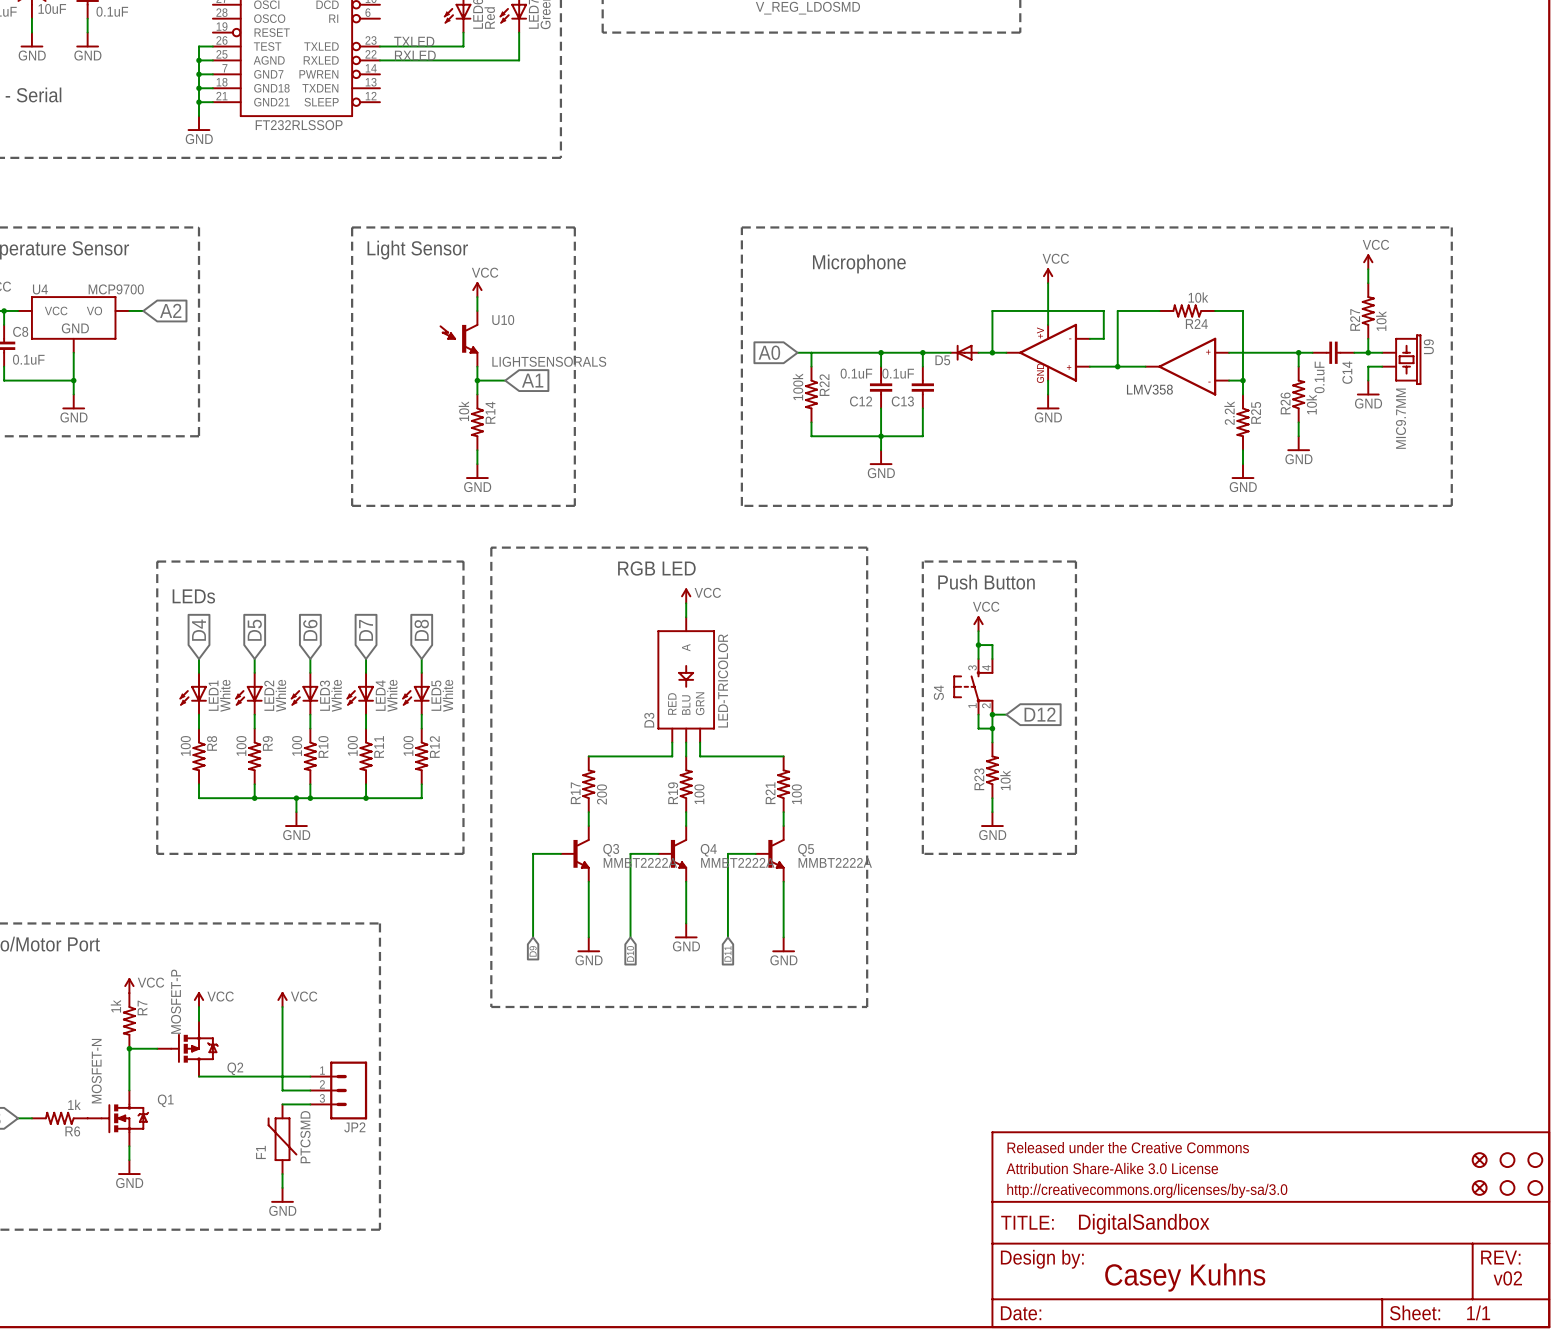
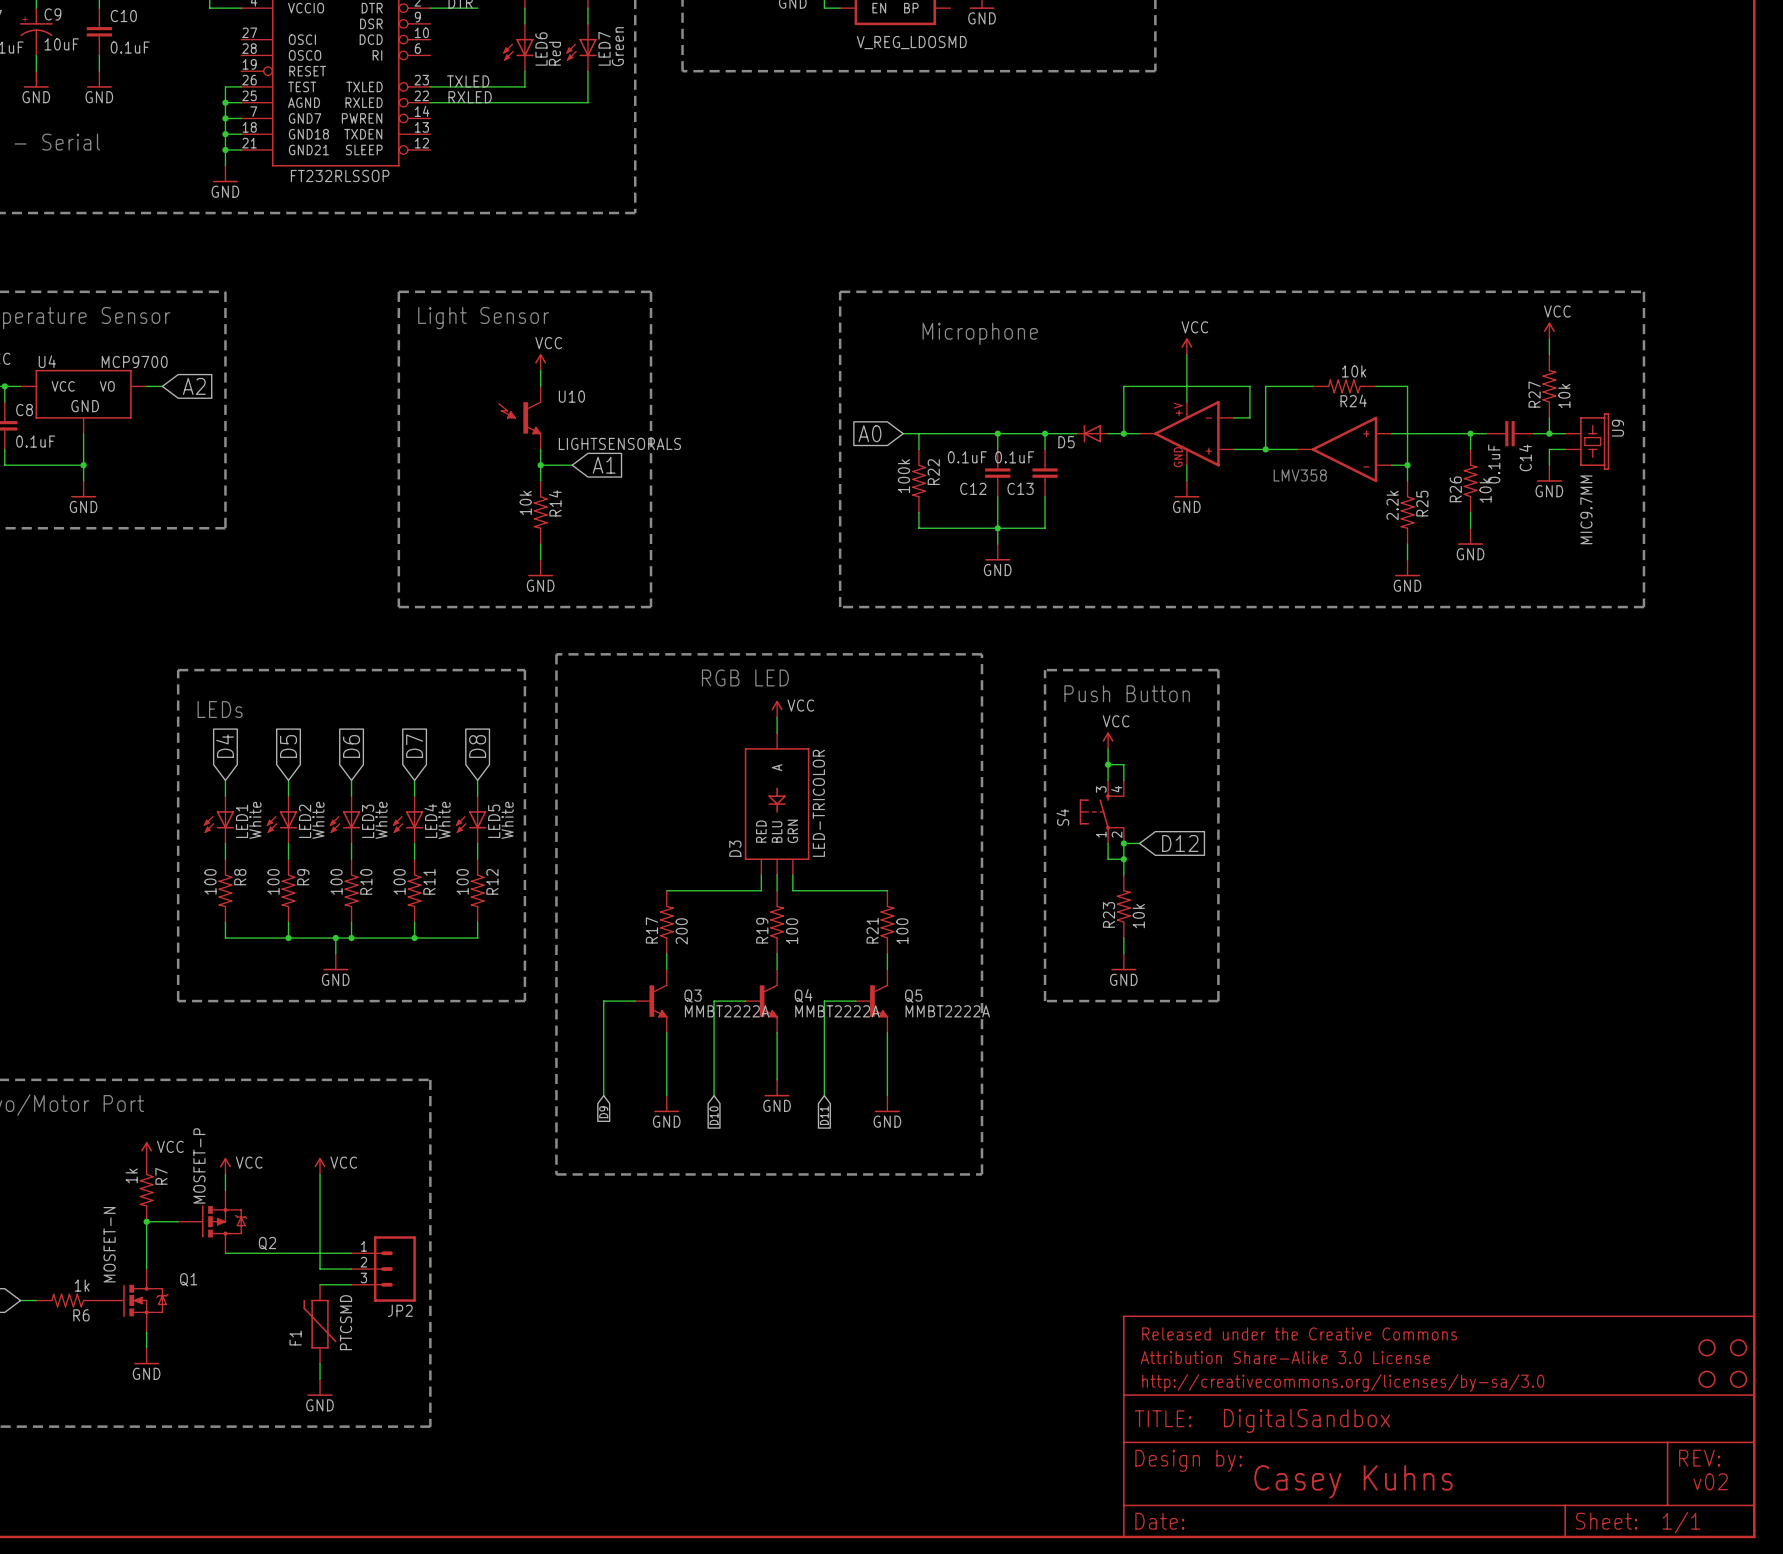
part: (1479, 1160) -> none
part: (1479, 1187) -> none

